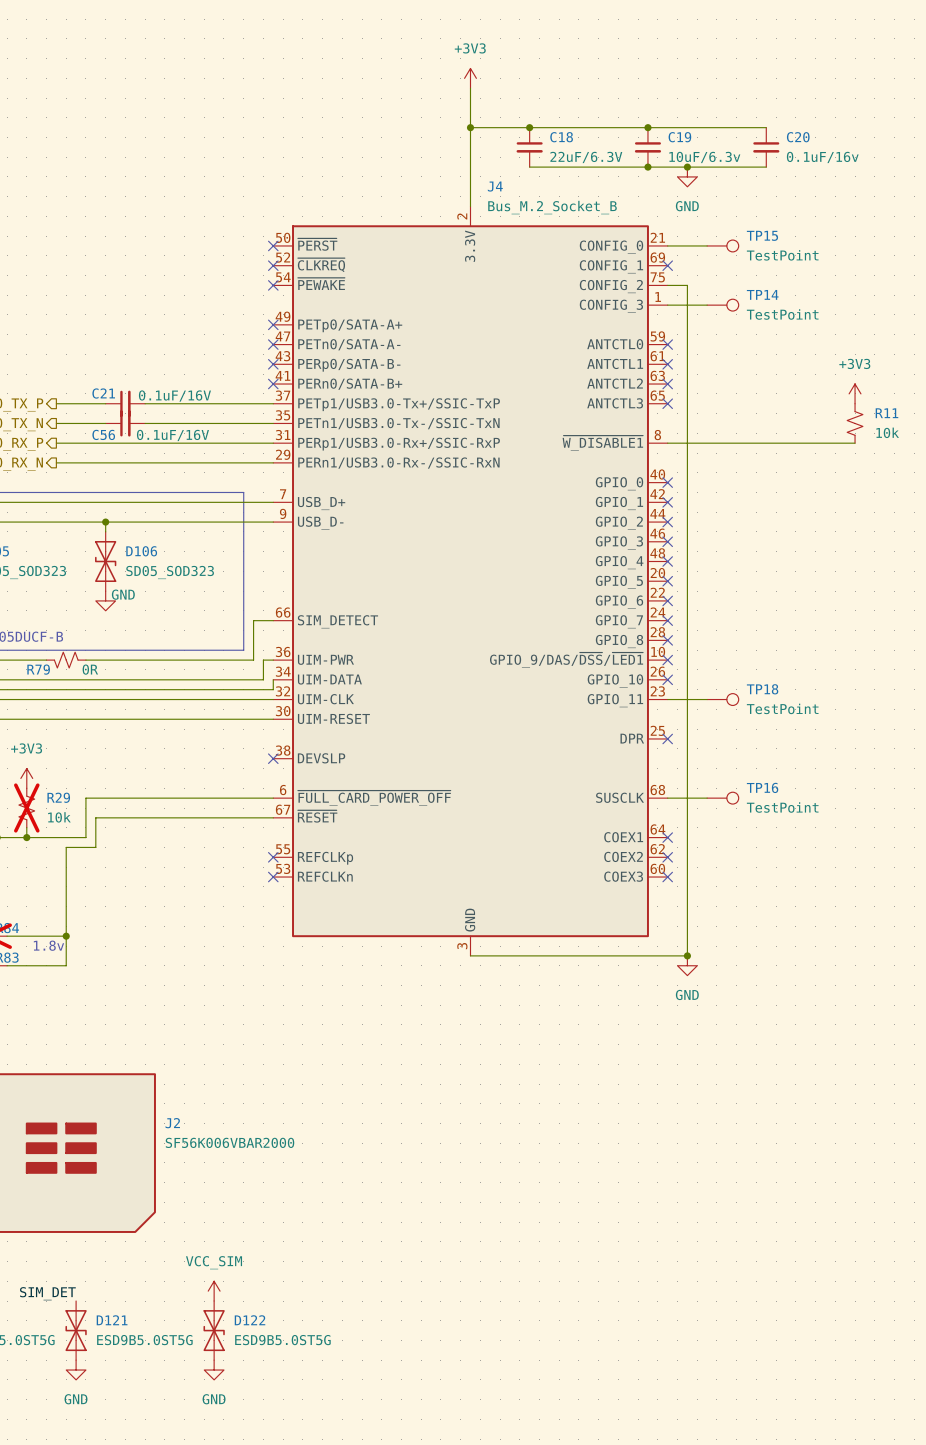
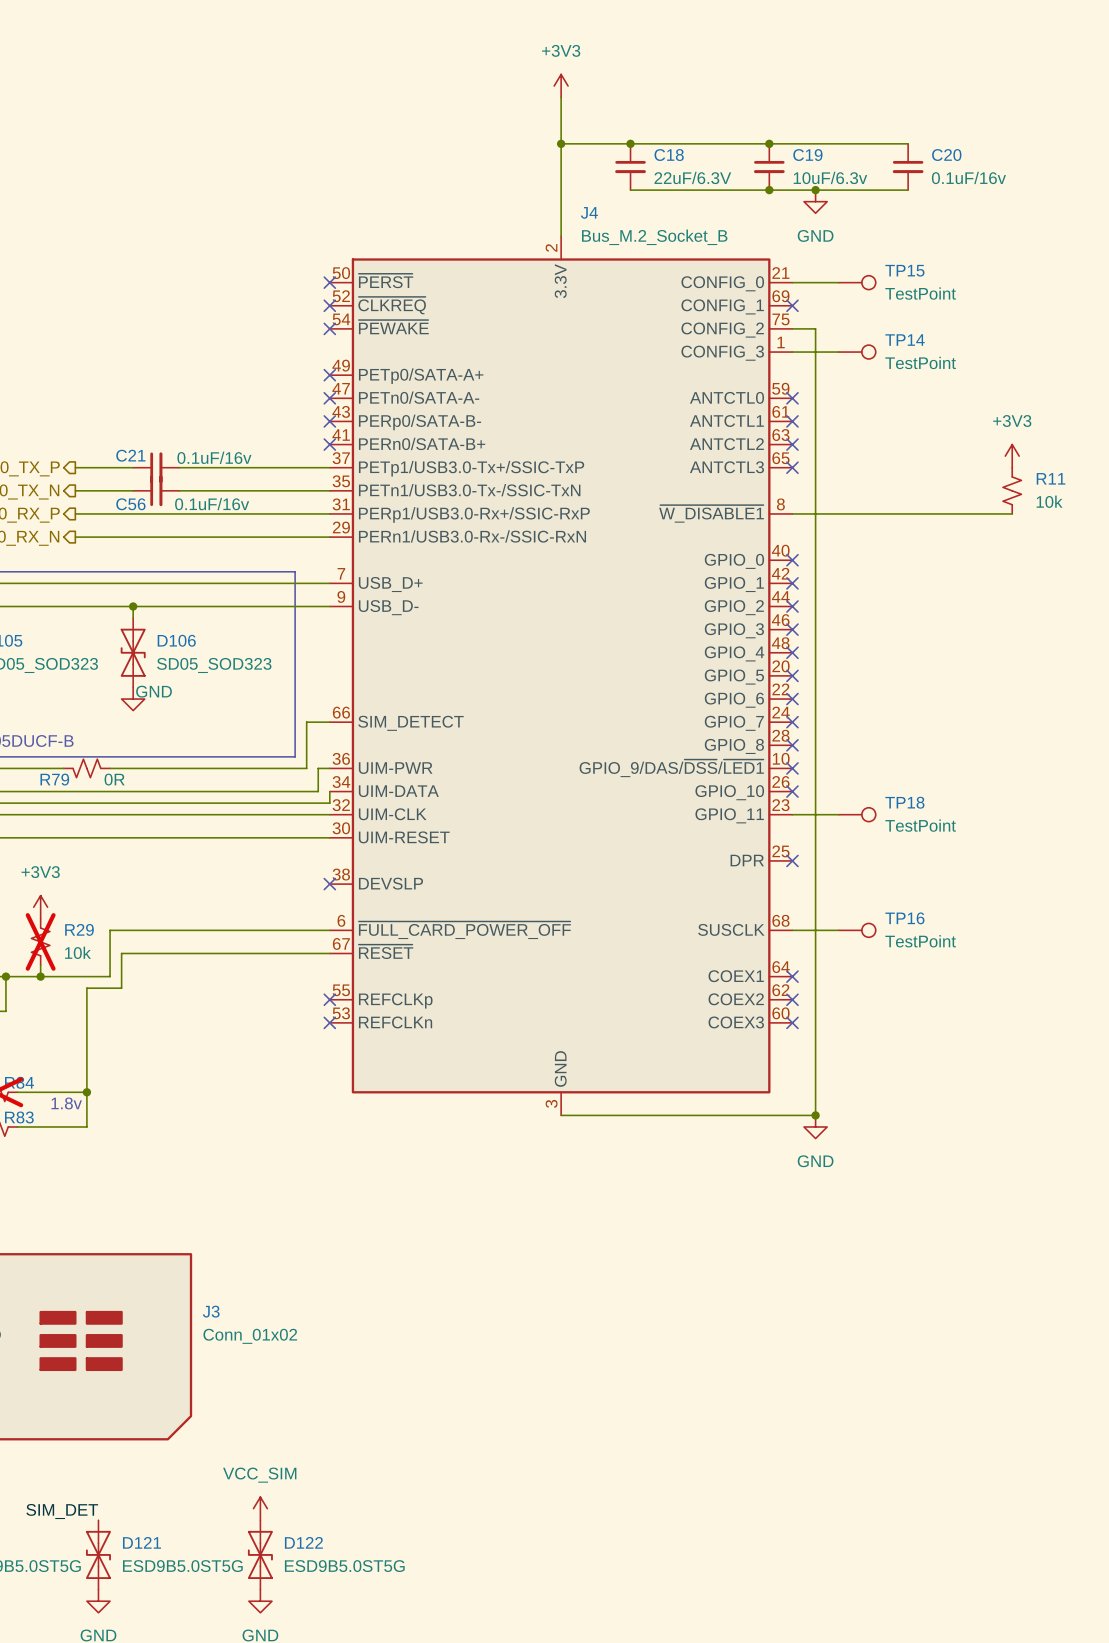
C21 value: 0.1uF/16V (174, 396) -> 0.1uF/16v (214, 457)
C56 value: 0.1uF/16V (172, 435) -> 0.1uF/16v (212, 504)
J2 name: J2 (172, 1123) -> J3 (211, 1311)
J2 value: SF56K006VBAR2000 (229, 1142) -> Conn_01x02 (250, 1336)

